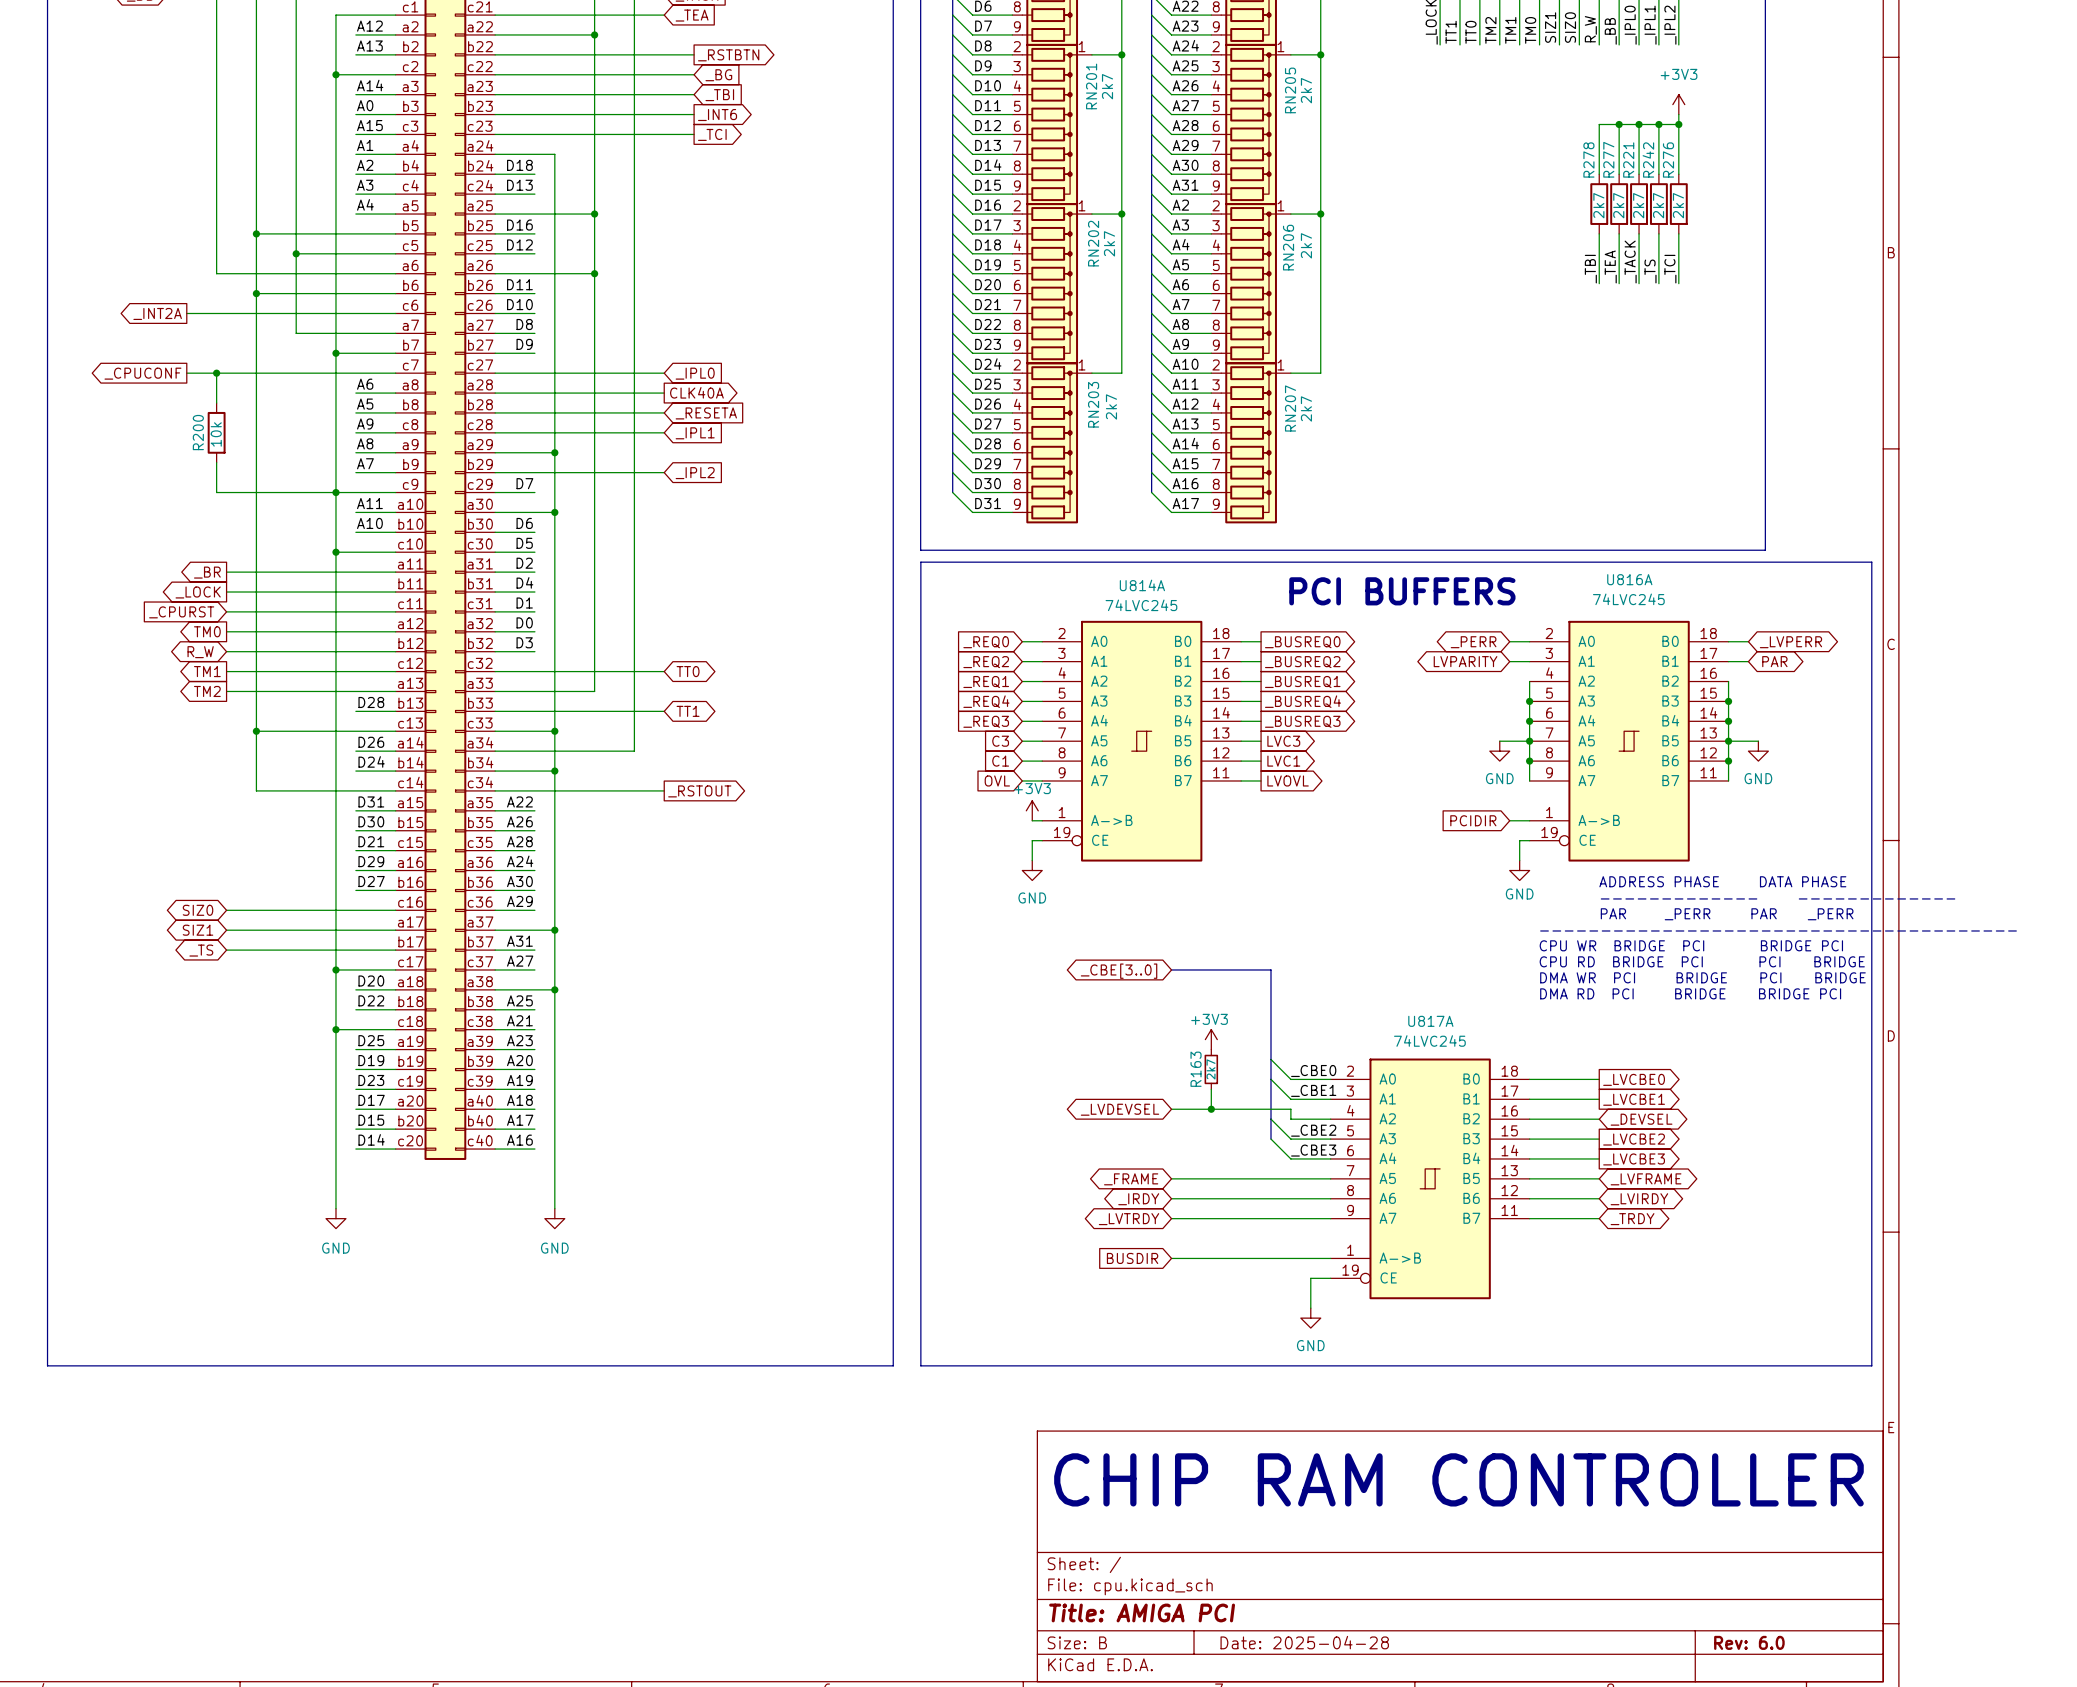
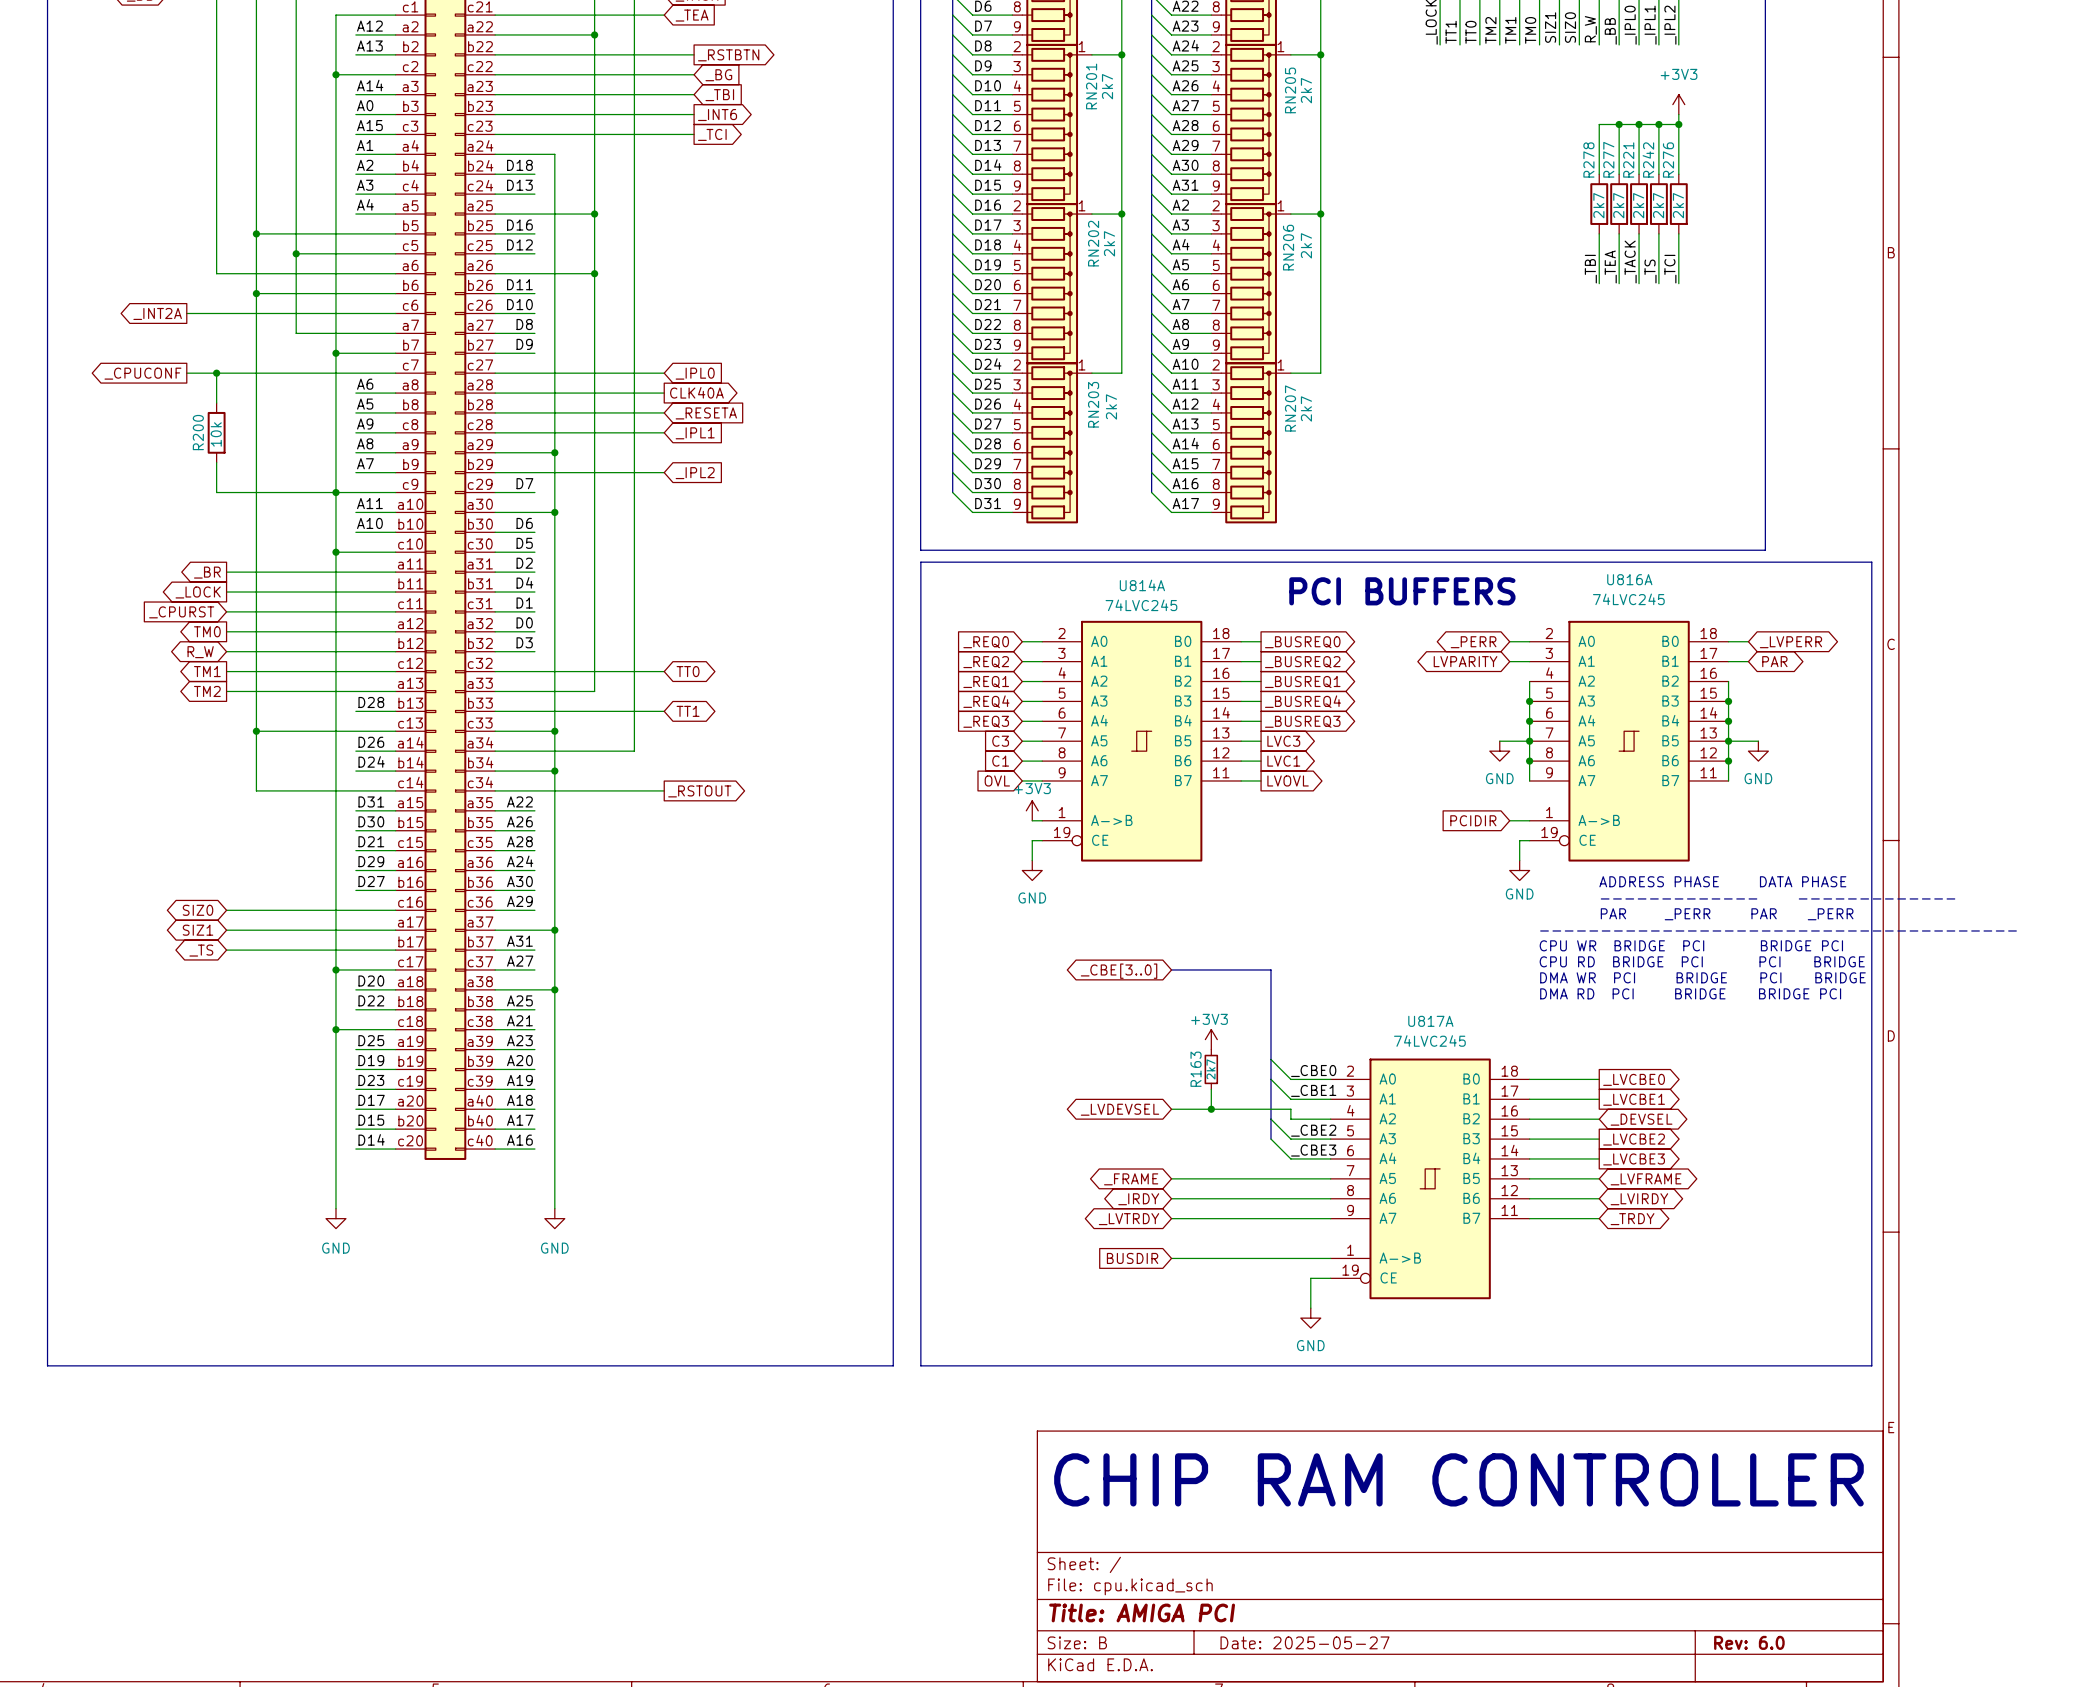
title block: Date: 2025-04-28 (1304, 1642) -> Date: 2025-05-27 (1305, 1642)

